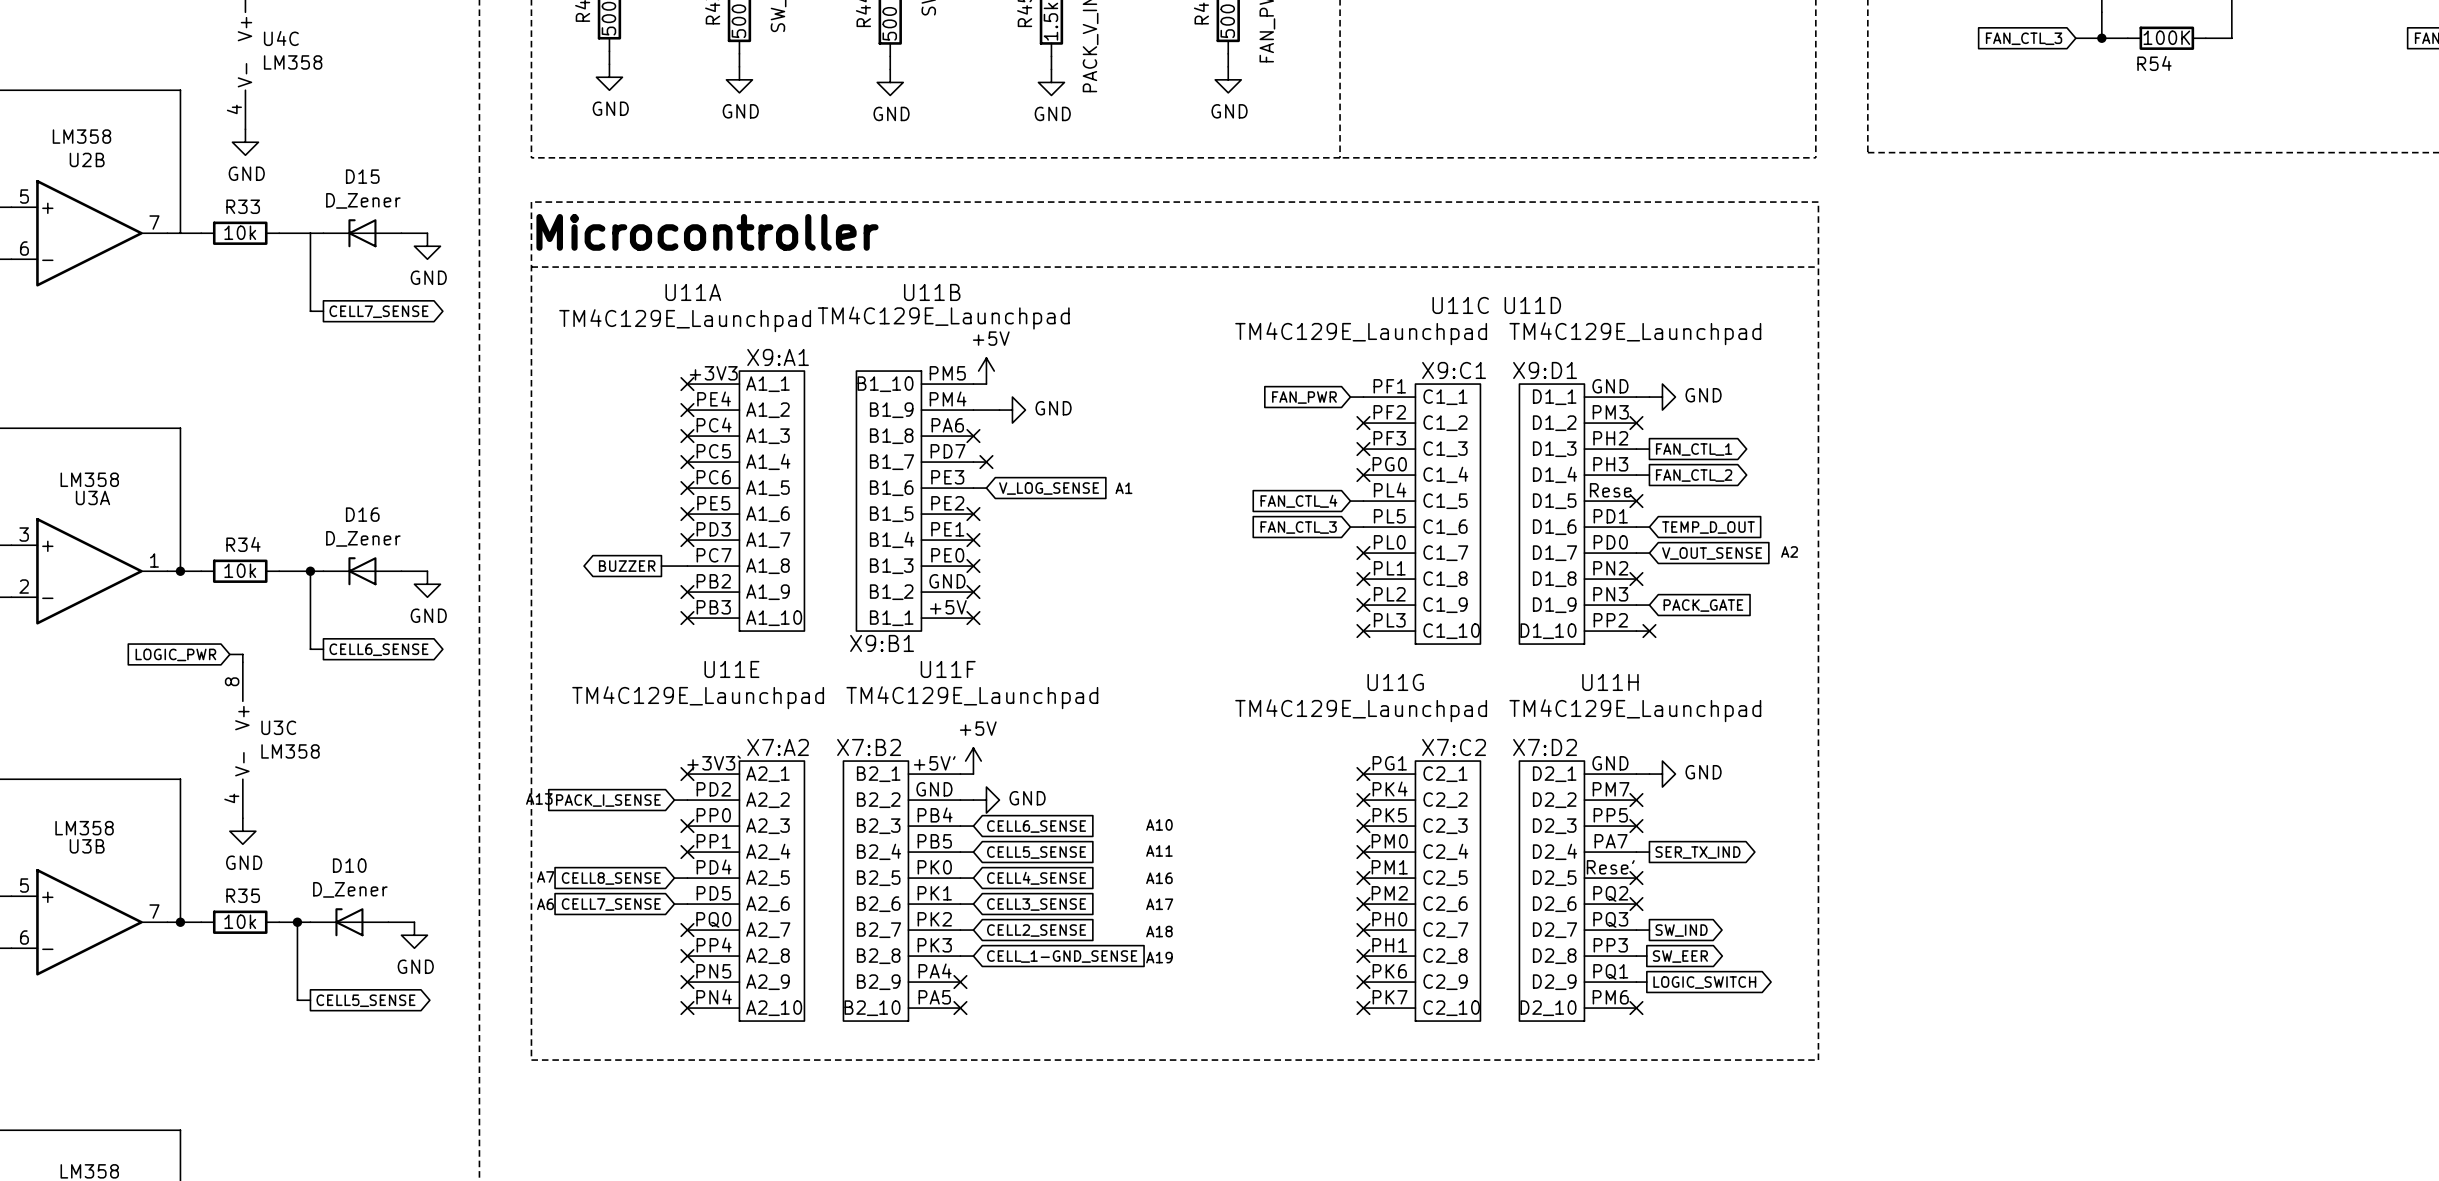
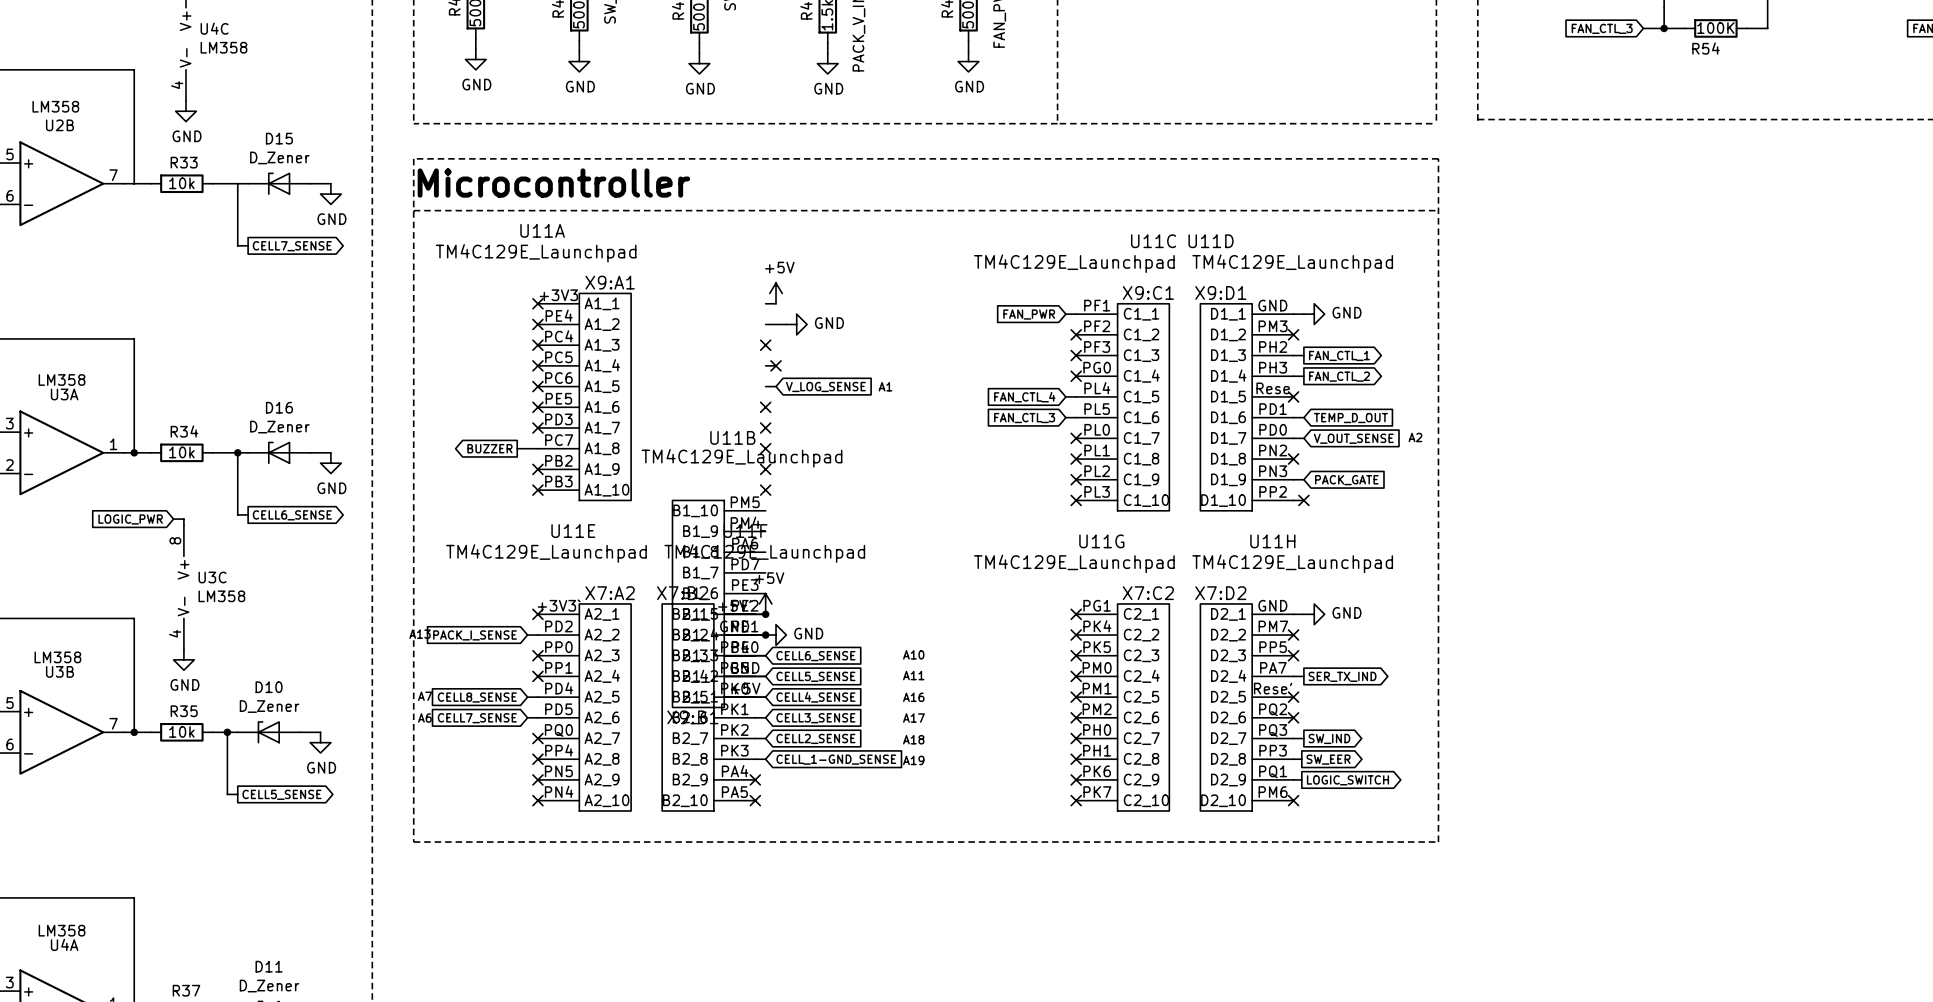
U11B position: (914, 501) -> (719, 603)
junction: none -> (765, 614)
junction: none -> (765, 635)

